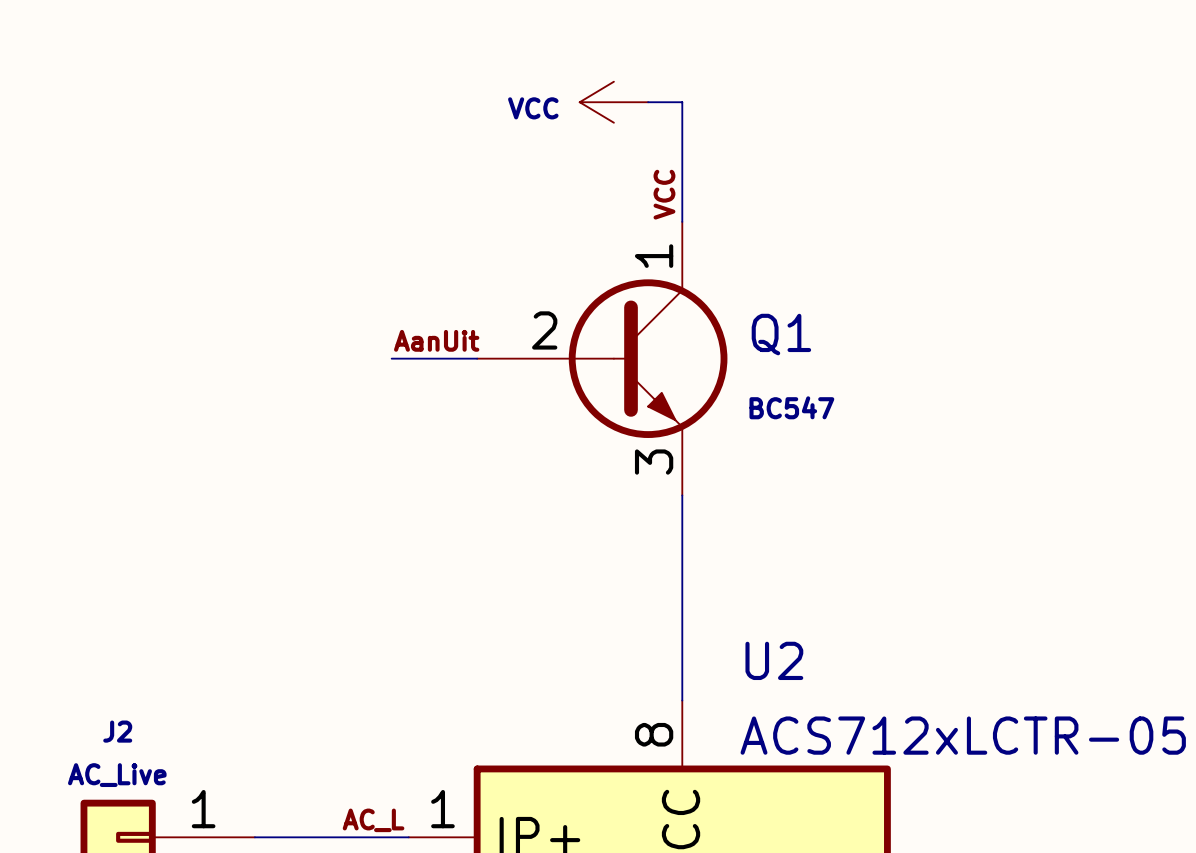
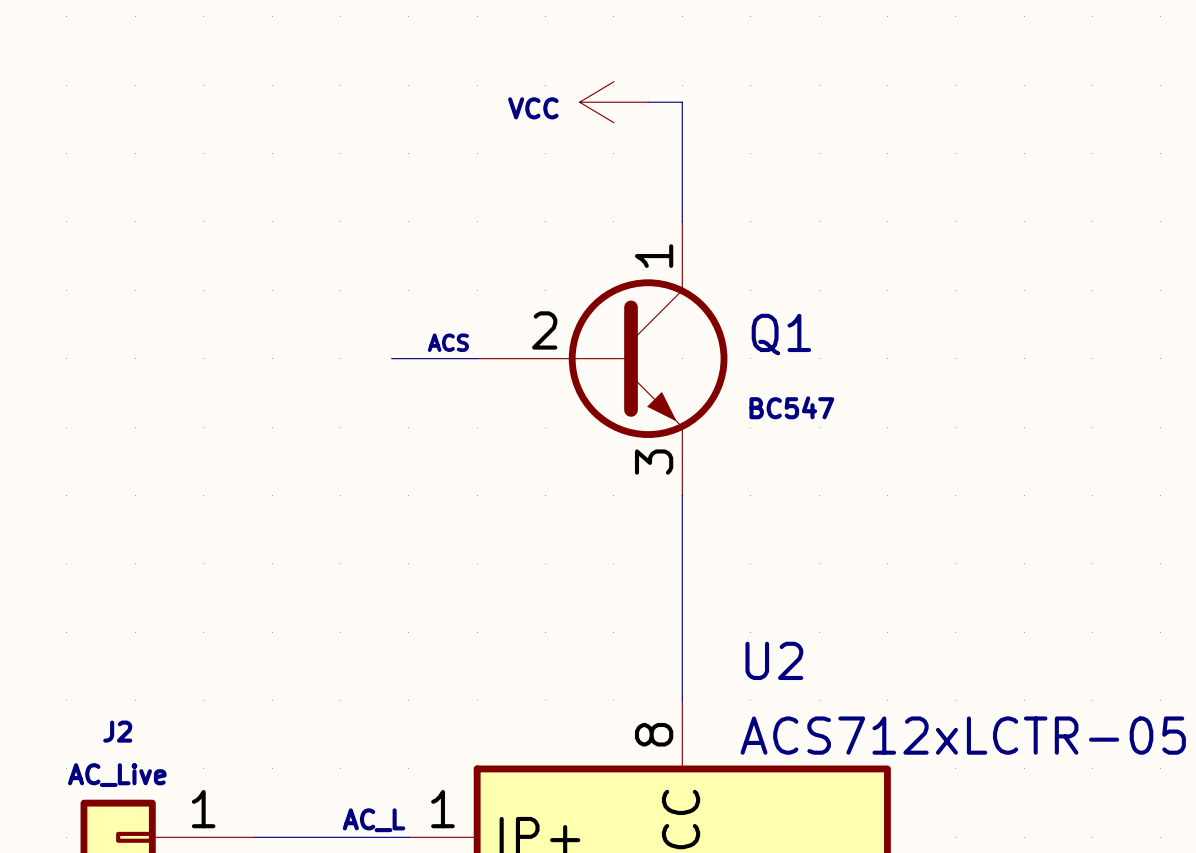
label: VCC (664, 194) -> none
label: AanUit (436, 340) -> none
text: none -> ACS (448, 342)
label: AC_L (373, 820) -> none
text: none -> AC_L (374, 820)

